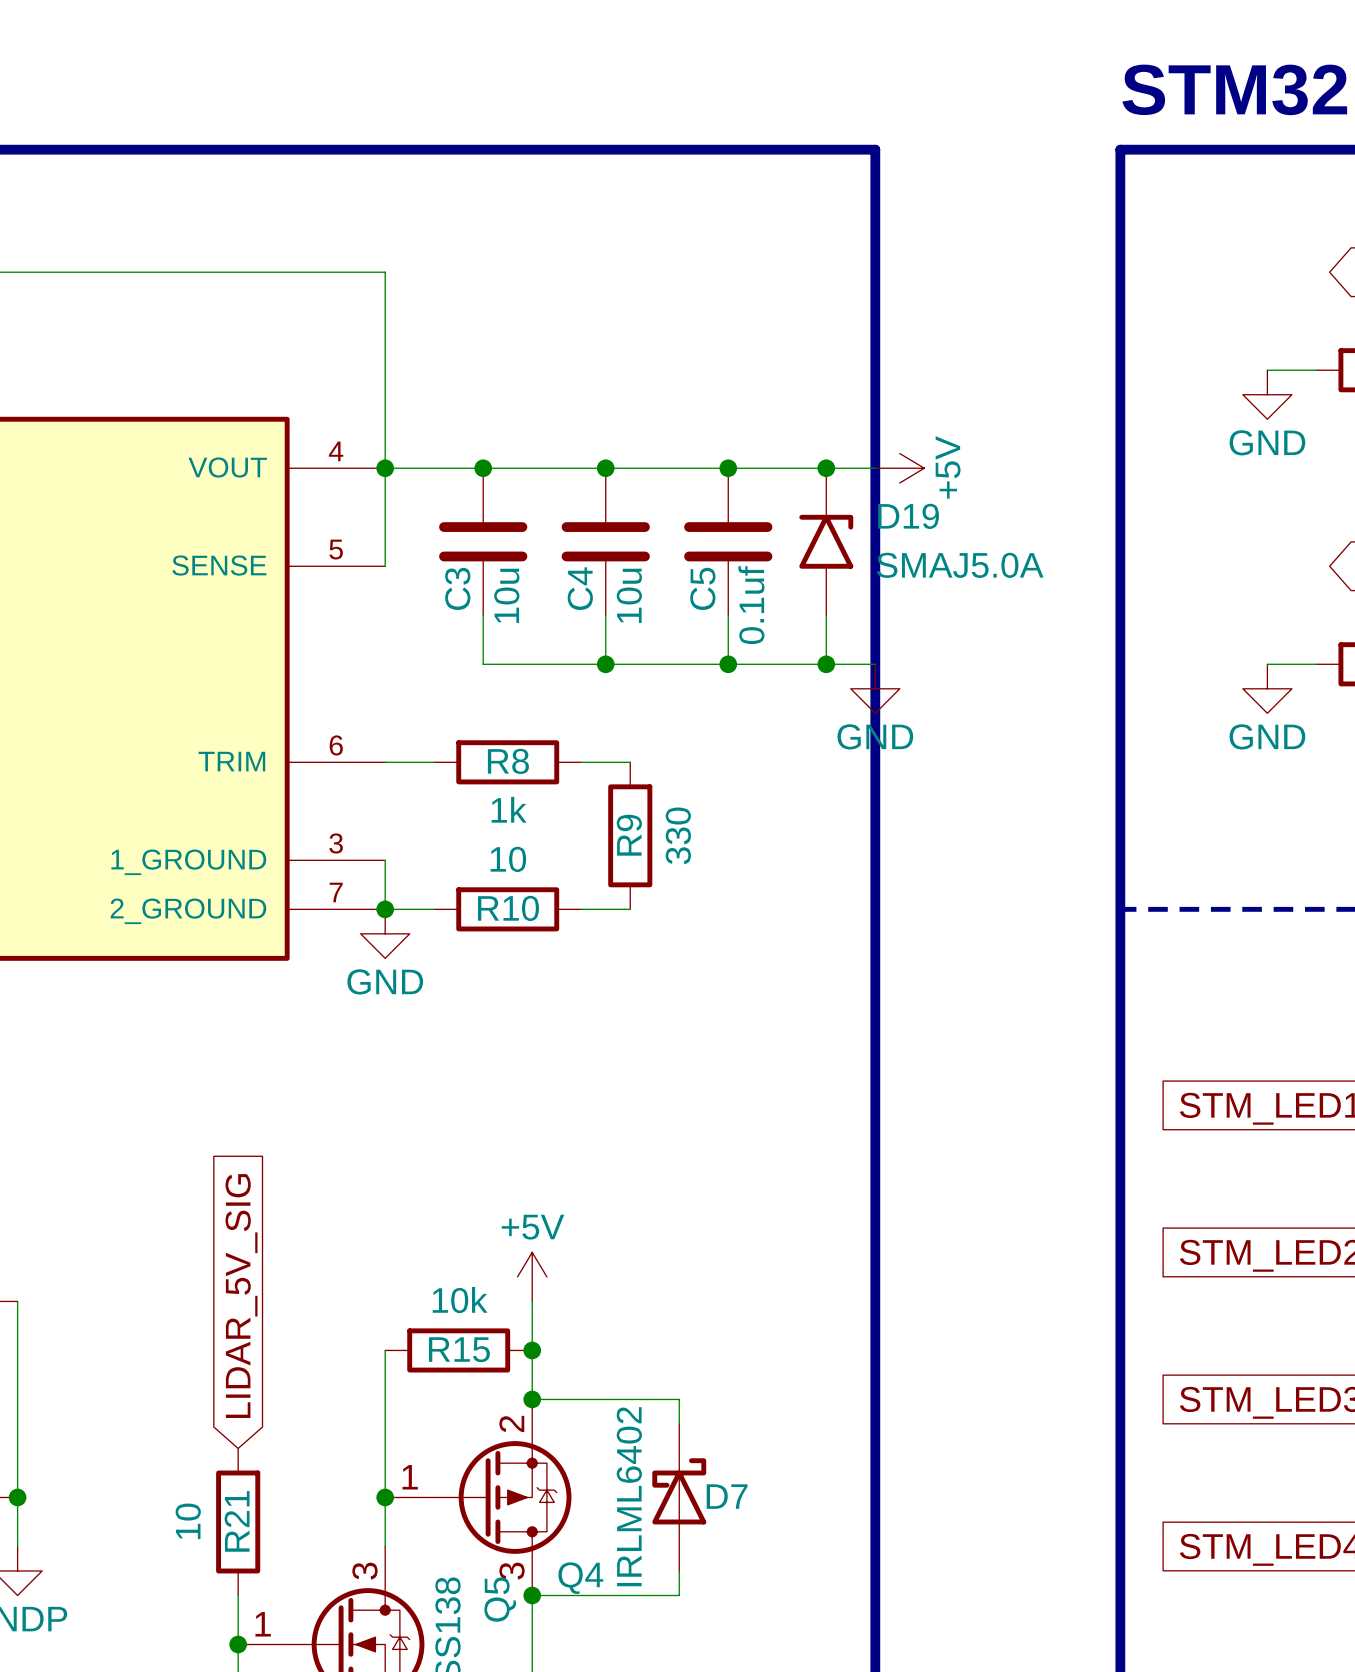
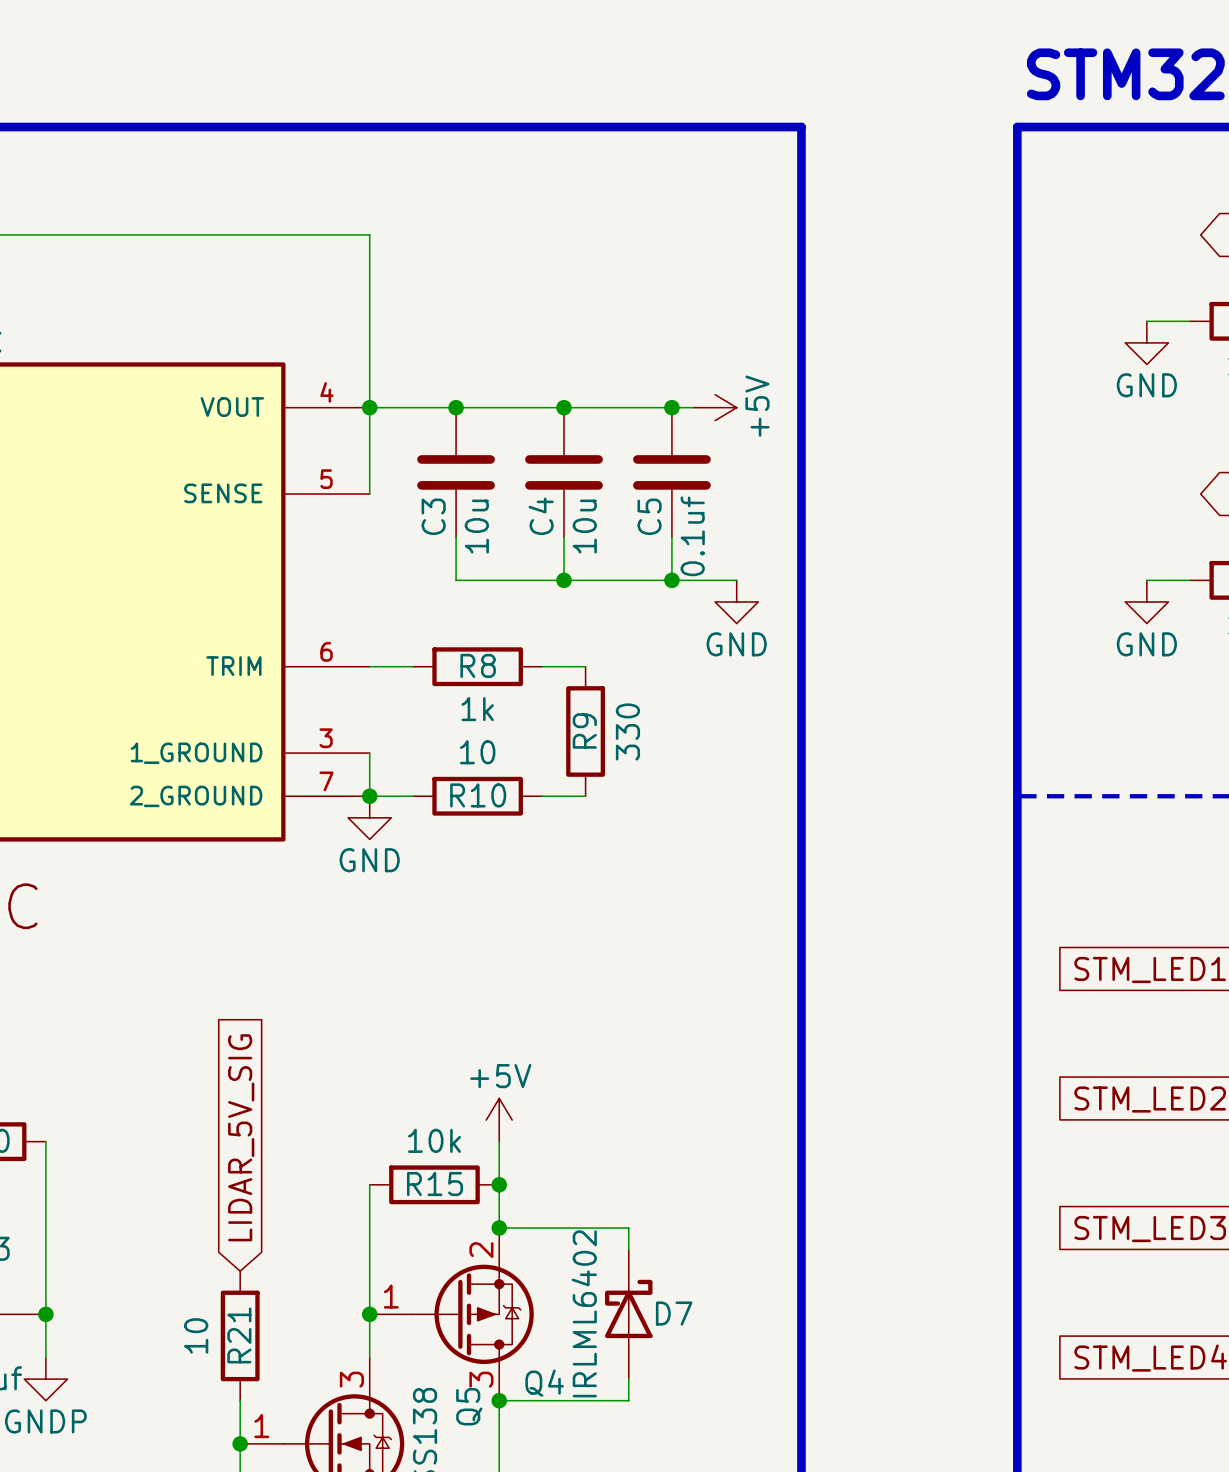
wire: (752, 468) (875, 468) -> none
junction: (826, 468) -> none
power symbol position: +5V (899, 468) -> +5V (715, 407)
D19: SMAJ5.0A (826, 541) -> none
wire: (826, 615) (826, 664) -> none
wire: (801, 664) (875, 664) -> none
junction: (826, 664) -> none
power symbol position: GND (875, 688) -> GND (736, 601)

